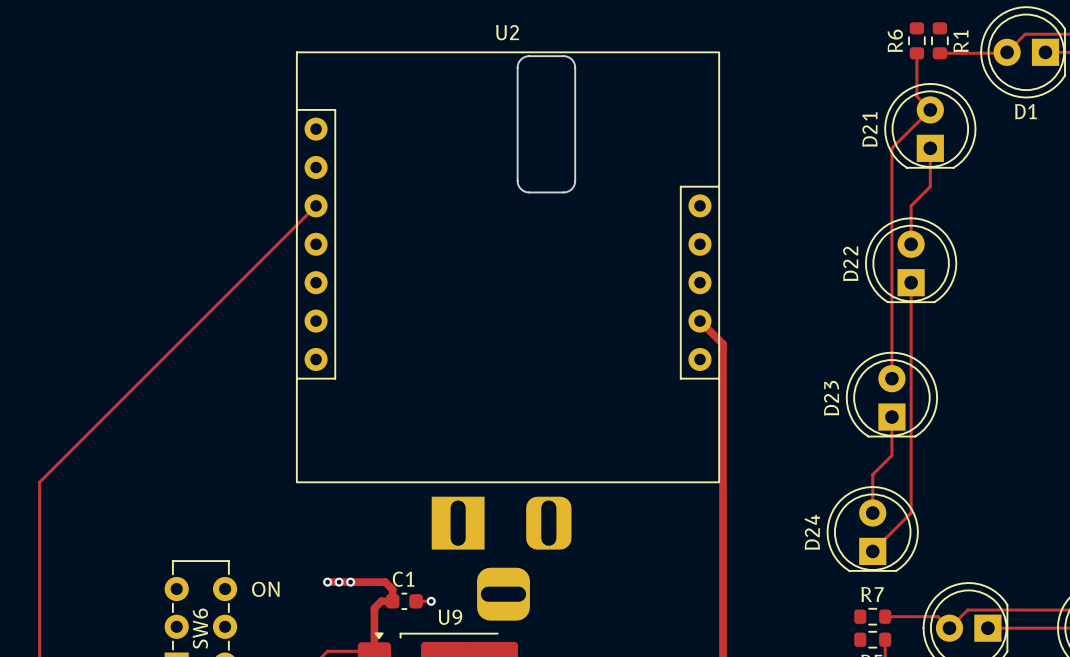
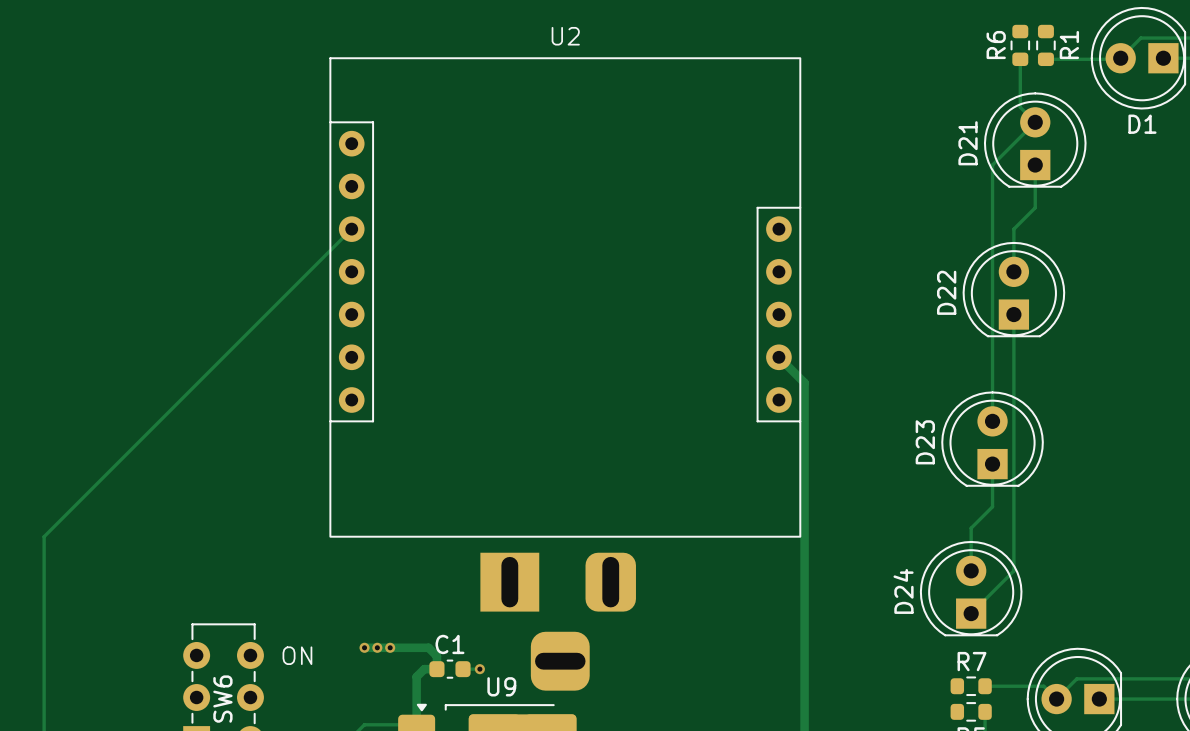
board edge: (529, 56) (565, 56) (570, 58) (574, 64) (575, 180) (572, 187) (566, 192) (527, 192) (522, 190) (518, 183) (517, 66) (520, 59) (529, 56) -> none

